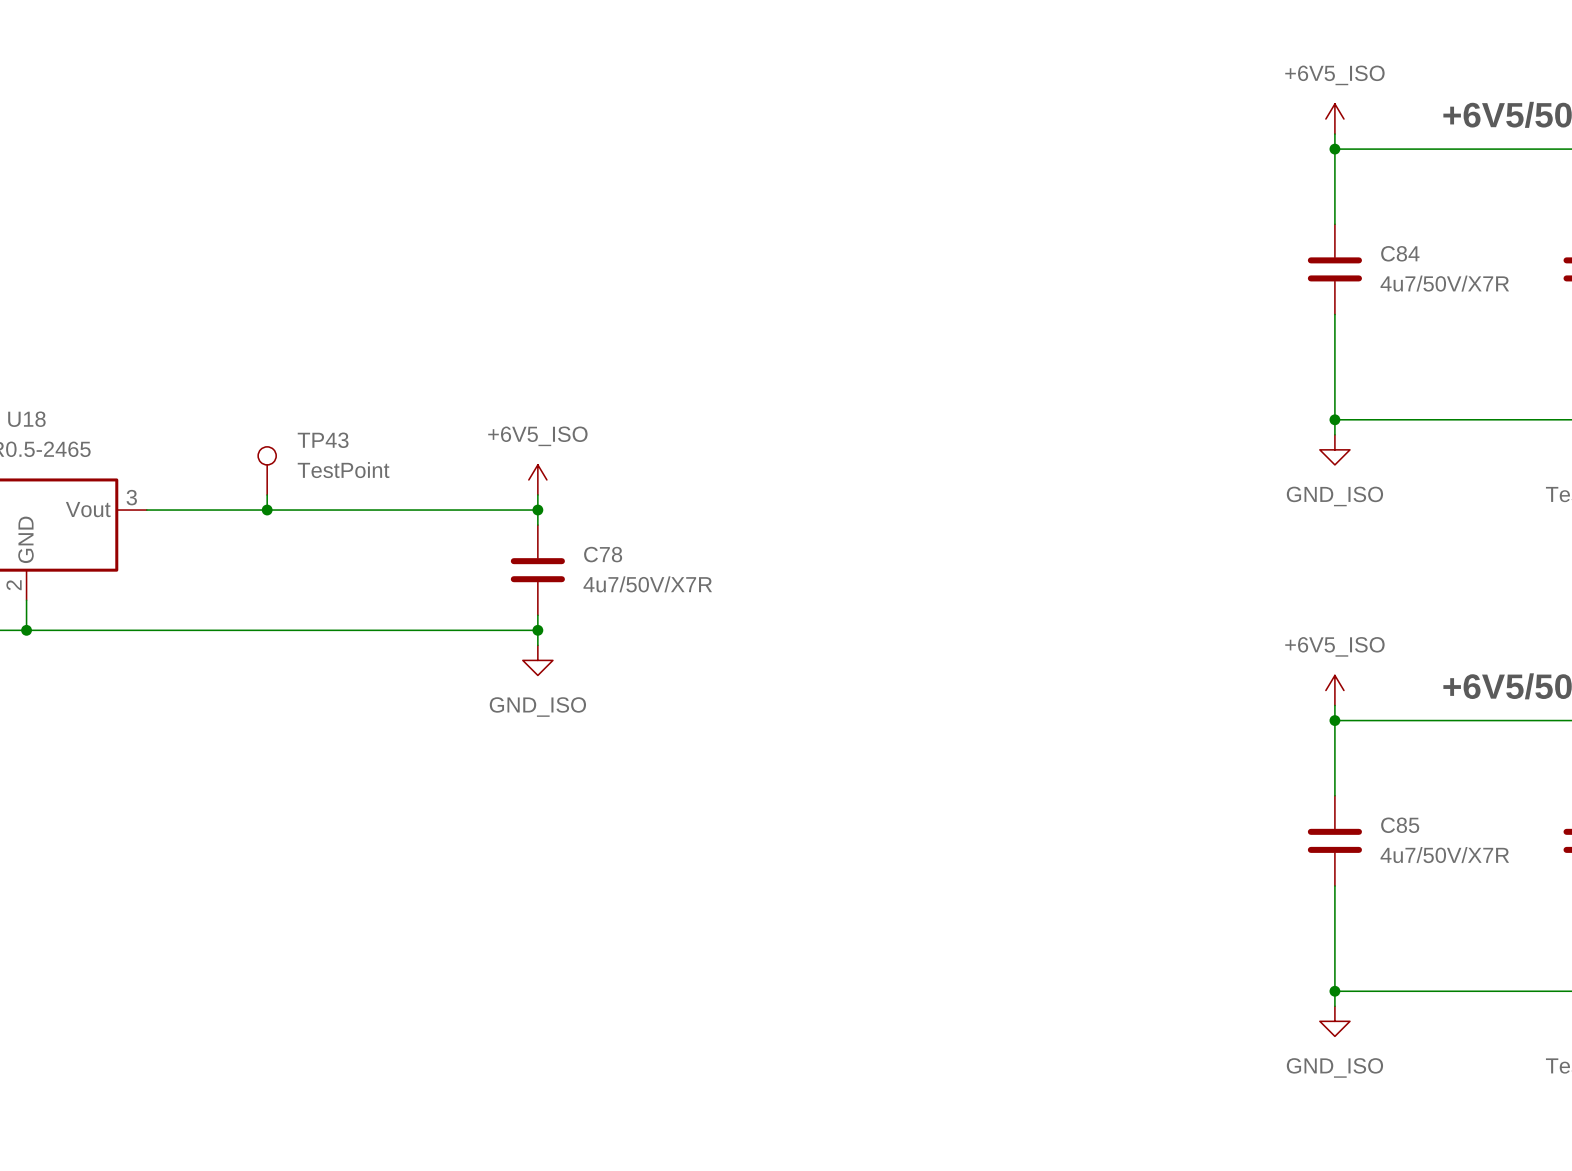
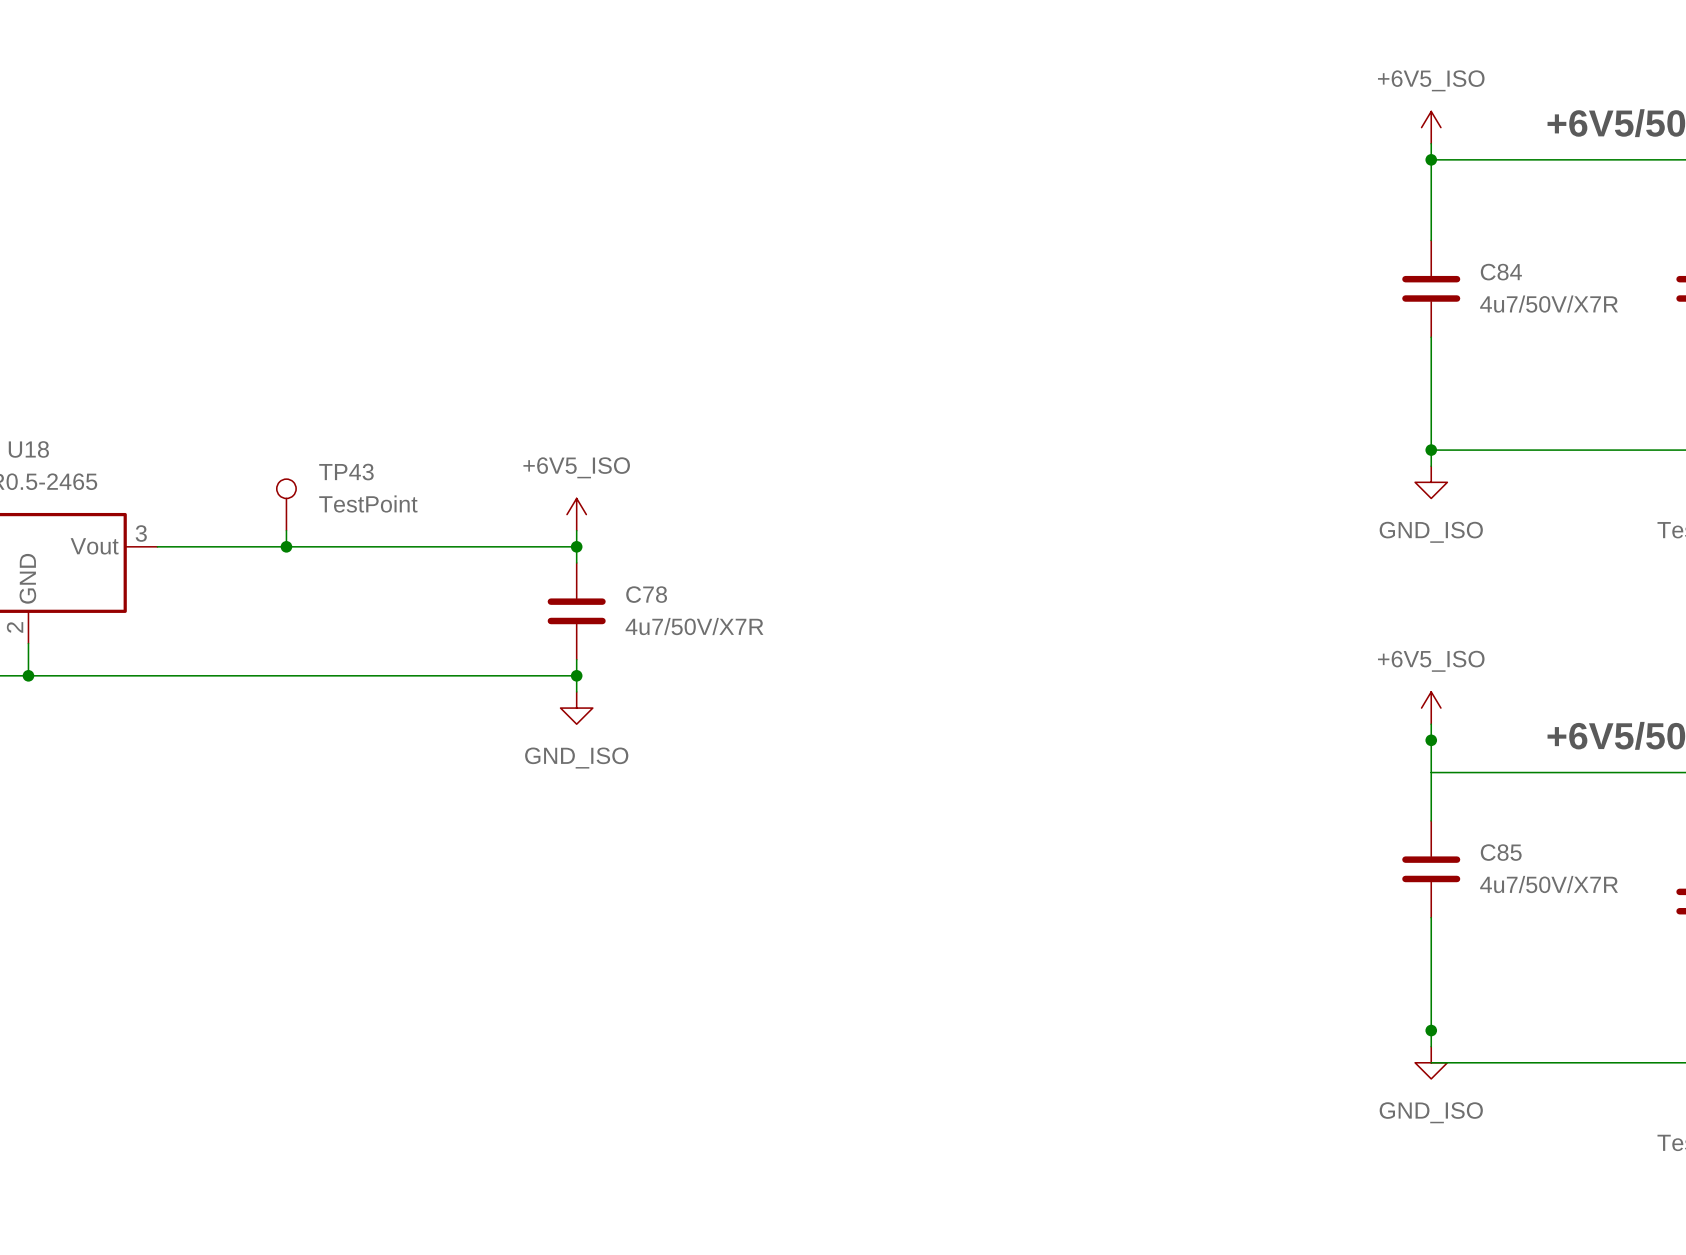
power symbol position: +6V5_ISO (1334, 690) -> +6V5_ISO (1431, 708)
junction position: (1334, 720) -> (1431, 740)
C85 position: (1334, 840) -> (1431, 869)
junction position: (1334, 991) -> (1431, 1030)
power symbol position: GND_ISO (1334, 1021) -> GND_ISO (1431, 1062)

